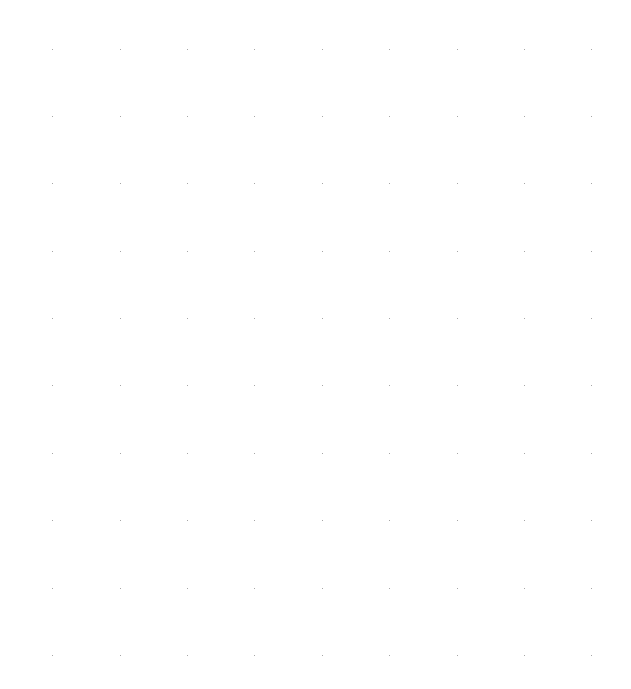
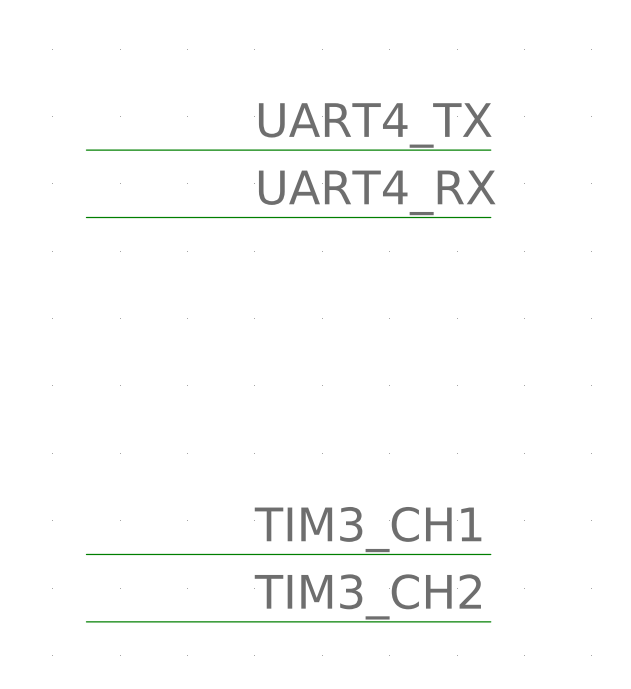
label: none -> UART4_TX (375, 125)
wire: none -> (86, 150) (490, 150)
label: none -> UART4_RX (377, 192)
wire: none -> (86, 217) (490, 217)
label: none -> TIM3_CH1 (368, 529)
wire: none -> (86, 554) (490, 554)
label: none -> TIM3_CH2 (367, 596)
wire: none -> (86, 621) (490, 621)

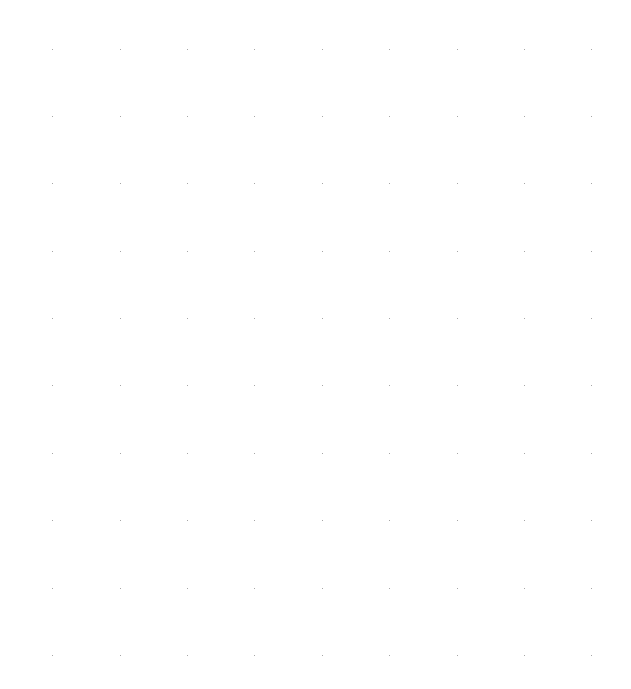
label: UART4_TX (375, 125) -> none
wire: (86, 150) (490, 150) -> none
label: UART4_RX (377, 192) -> none
wire: (86, 217) (490, 217) -> none
label: TIM3_CH1 (368, 529) -> none
wire: (86, 554) (490, 554) -> none
label: TIM3_CH2 (367, 596) -> none
wire: (86, 621) (490, 621) -> none

